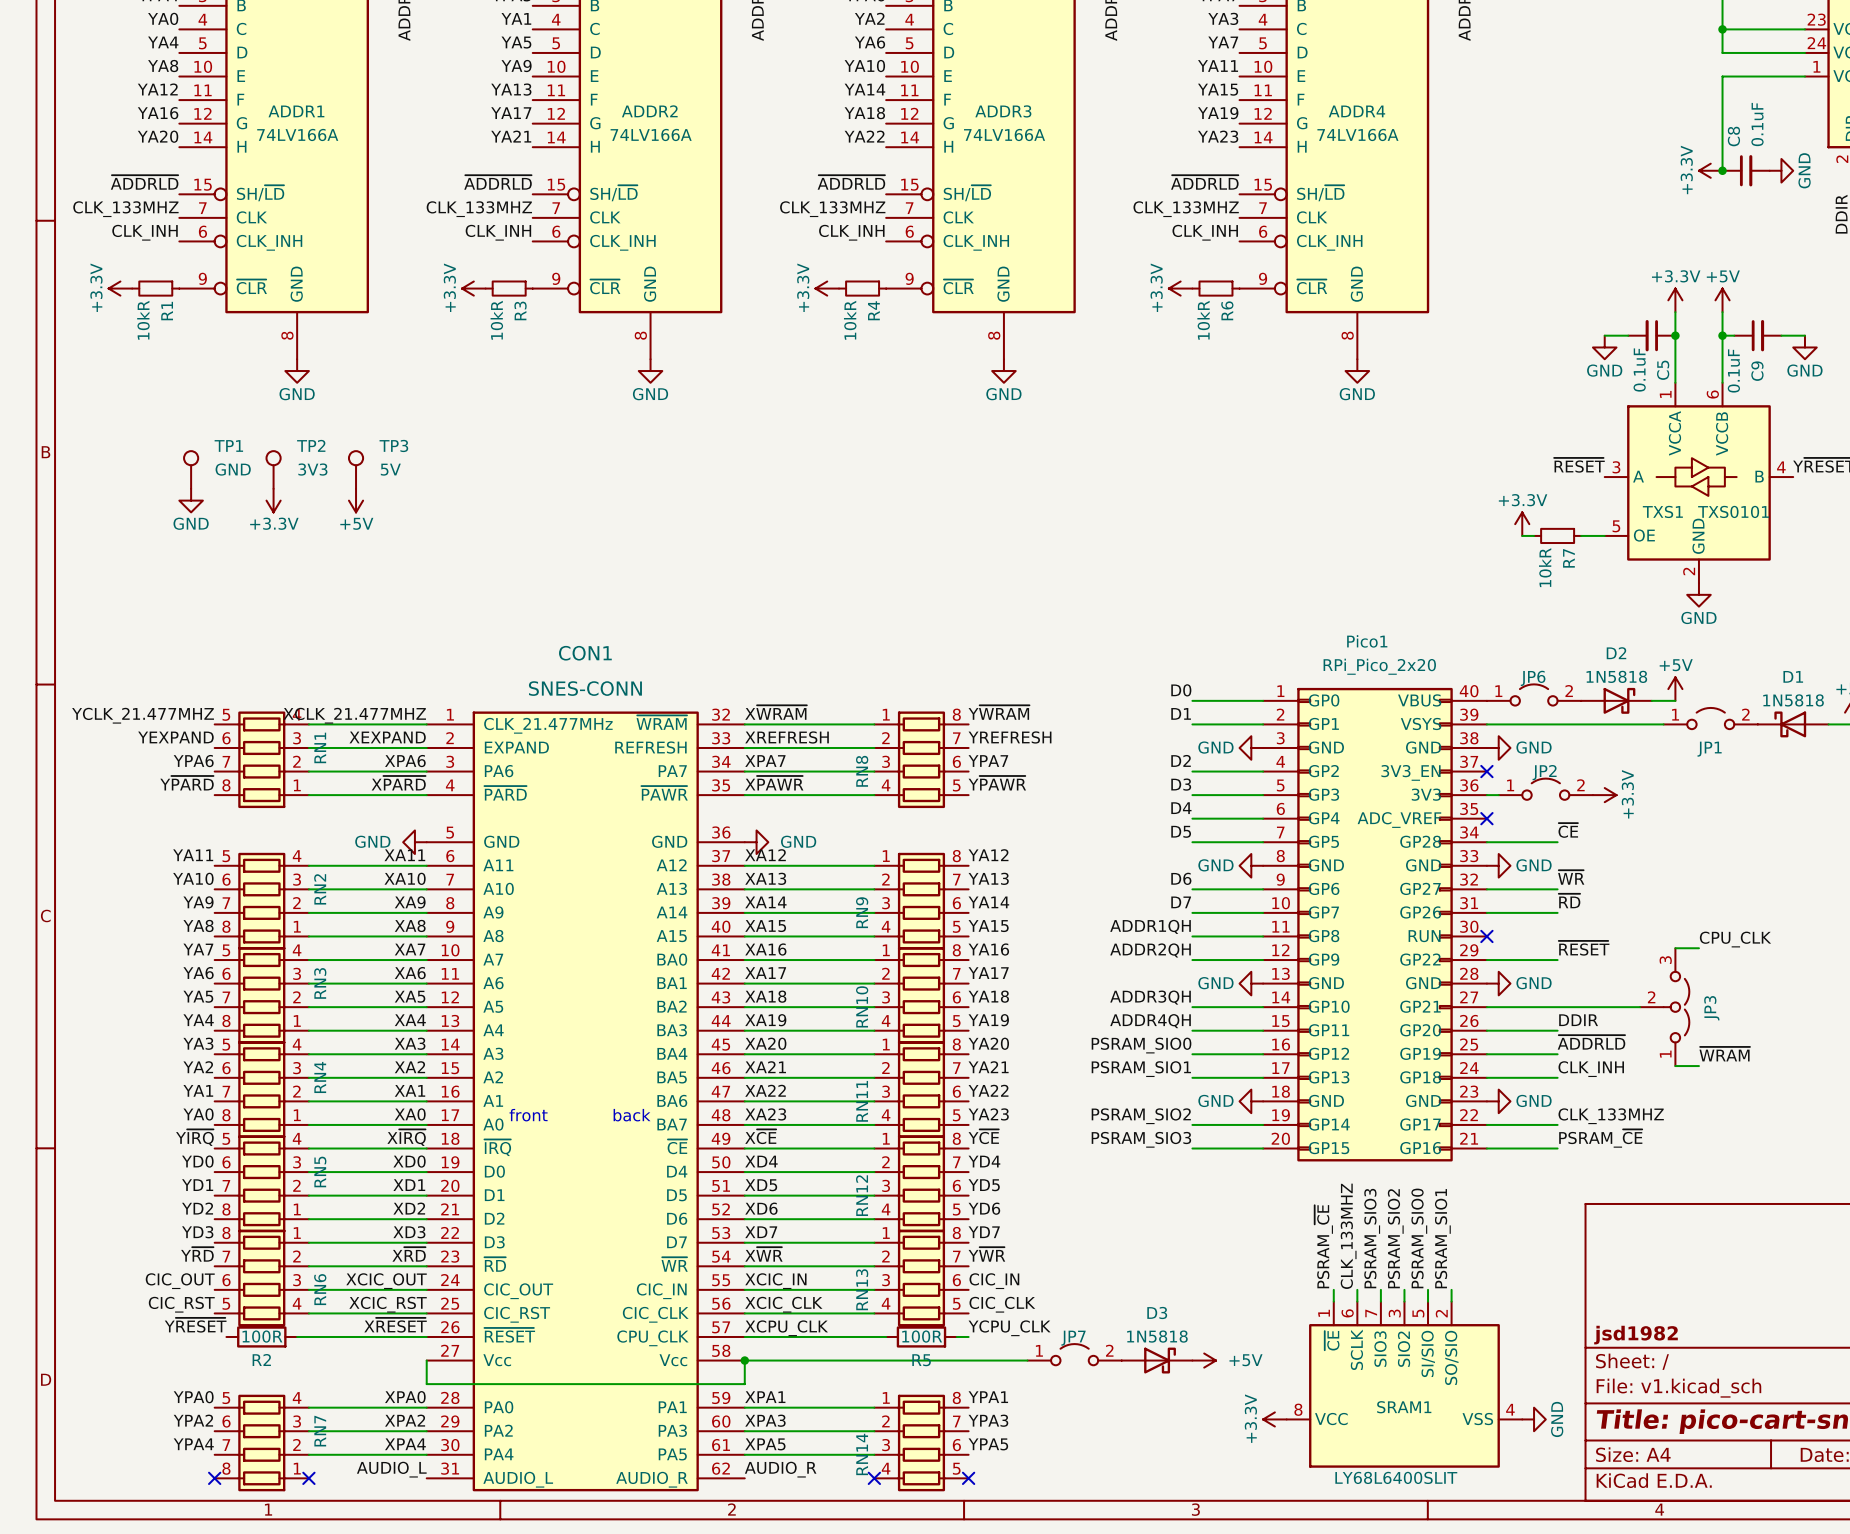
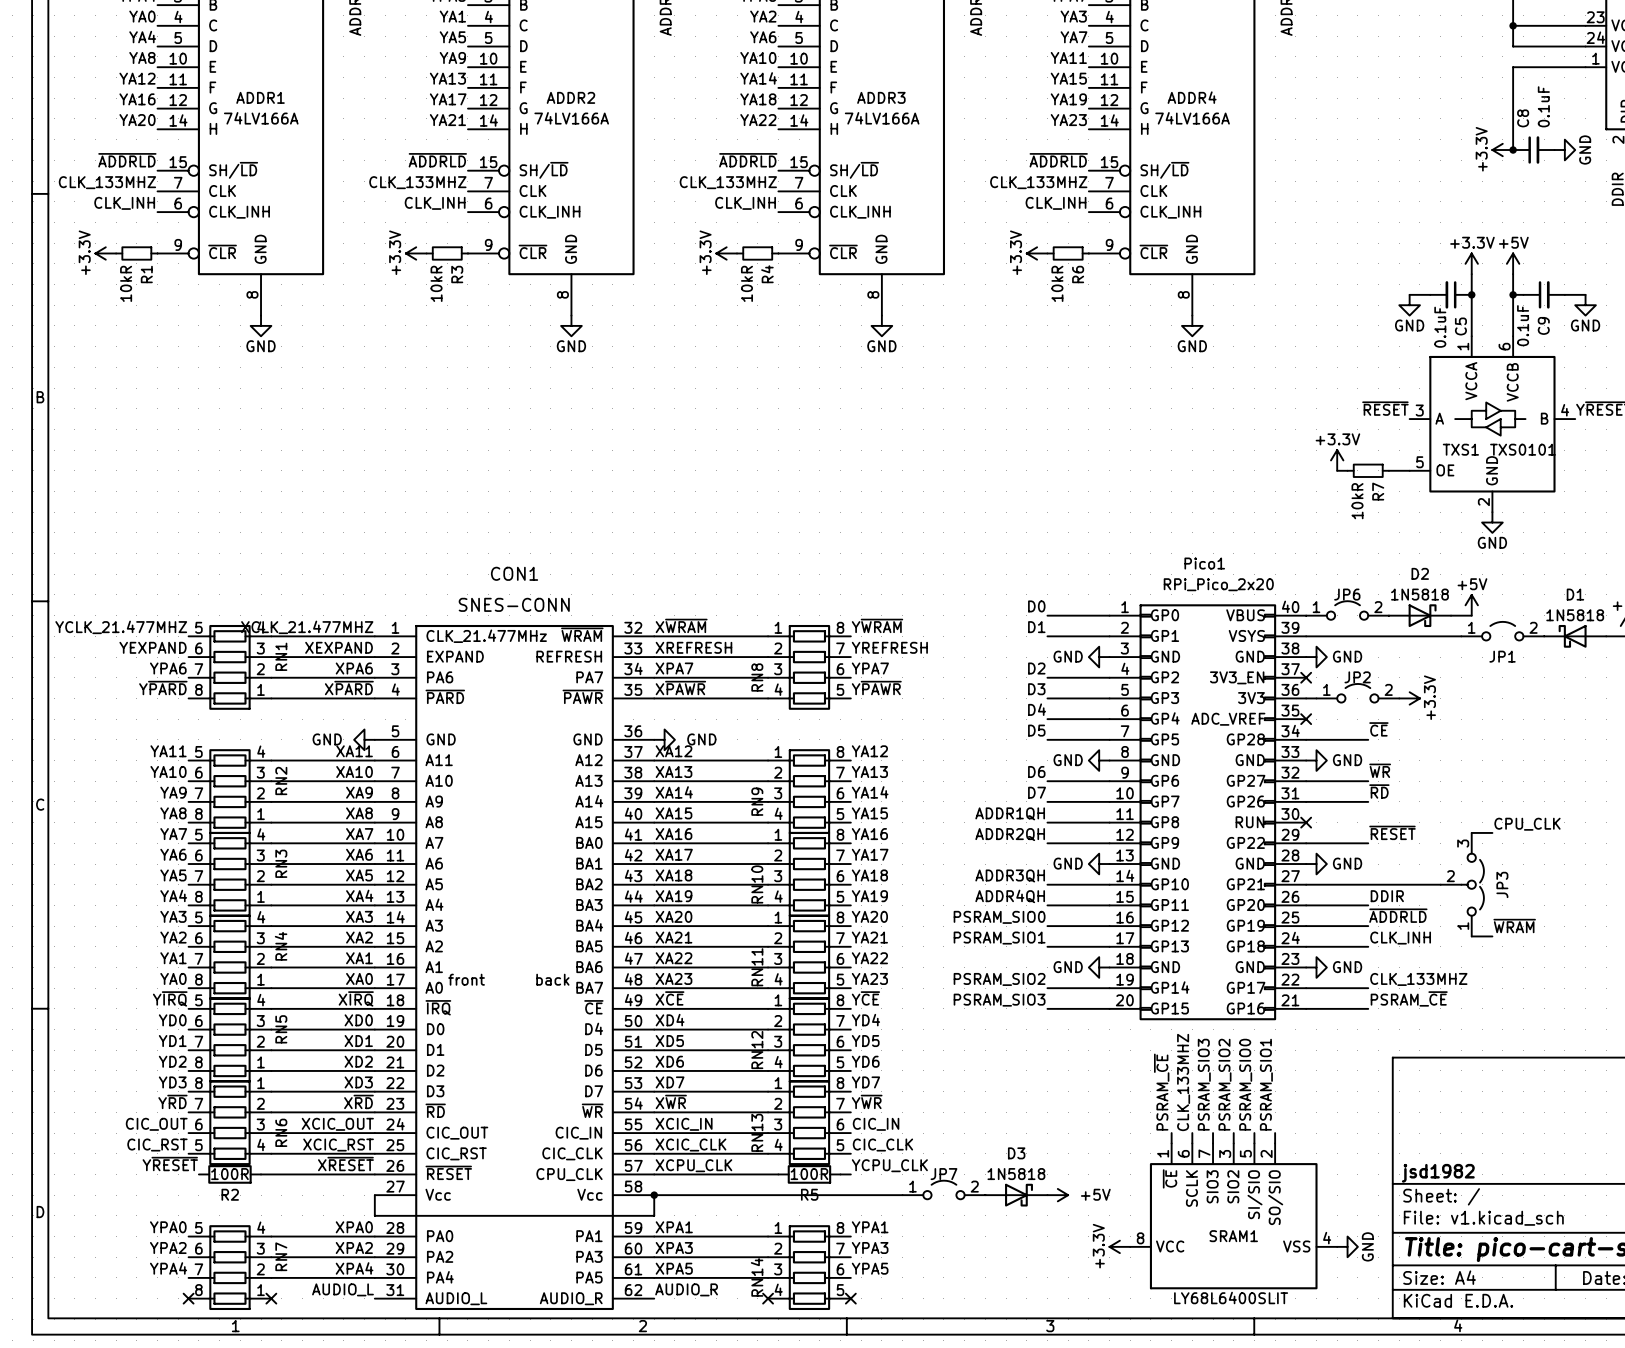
TP1: GND (191, 469) -> none
TP2: 3V3 (273, 469) -> none
TP3: 5V (356, 469) -> none
power symbol: GND (191, 500) -> none
power symbol: +3.3V (273, 500) -> none
power symbol: +5V (356, 500) -> none

